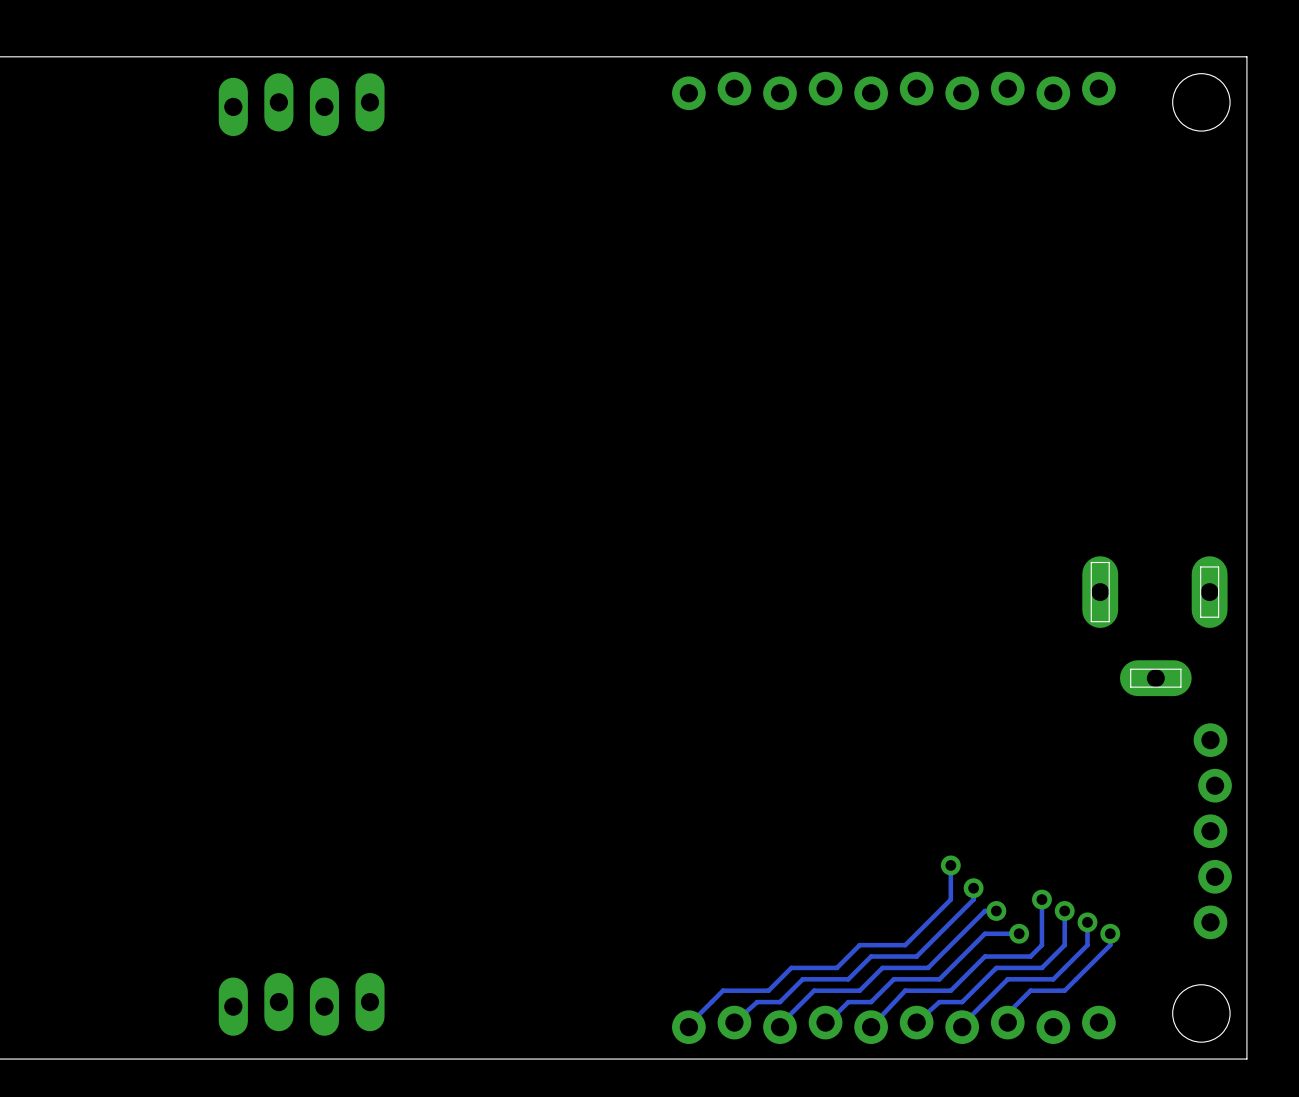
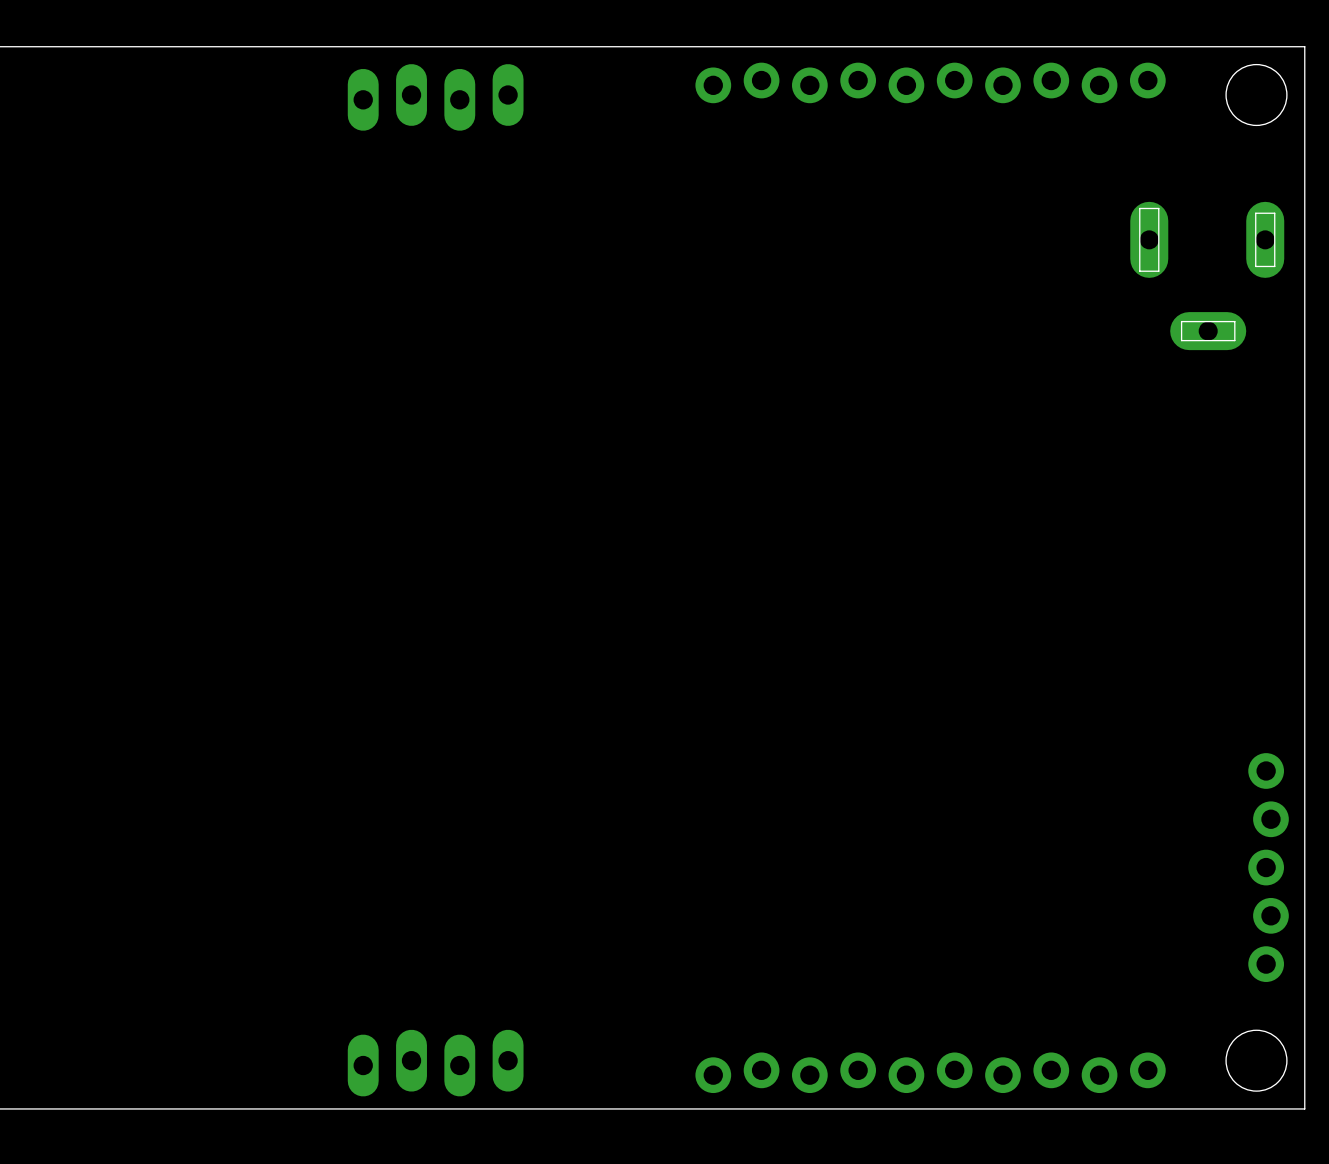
part position: (301, 104) -> (435, 97)
part position: (1154, 626) -> (1207, 275)
track: (950, 865) (950, 899) (905, 945) (859, 945) (836, 967) (791, 967) (768, 990) (723, 990) (688, 1024) (691, 1024) -> none
via: (950, 865) -> none
track: (973, 888) (973, 899) (916, 956) (871, 956) (848, 979) (802, 979) (779, 1002) (757, 1002) (734, 1022) -> none
via: (973, 888) -> none
track: (1041, 899) (1041, 945) (1030, 956) (984, 956) (950, 990) (905, 990) (871, 1027) -> none
via: (1041, 899) -> none
track: (996, 910) (984, 910) (928, 967) (882, 967) (859, 990) (814, 990) (779, 1024) (779, 1027) -> none
via: (996, 910) -> none
track: (1064, 910) (1064, 945) (1041, 967) (996, 967) (962, 1002) (939, 1002) (916, 1022) -> none
via: (1064, 910) -> none
track: (1087, 922) (1087, 945) (1053, 979) (1007, 979) (962, 1024) (962, 1027) -> none
via: (1087, 922) -> none
track: (1019, 933) (984, 933) (939, 979) (893, 979) (871, 1002) (848, 1002) (825, 1024) (825, 1022) -> none
via: (1019, 933) -> none
track: (1110, 933) (1110, 945) (1064, 990) (1030, 990) (1007, 1013) (1007, 1022) -> none
via: (1110, 933) -> none
part position: (301, 1004) -> (435, 1063)

